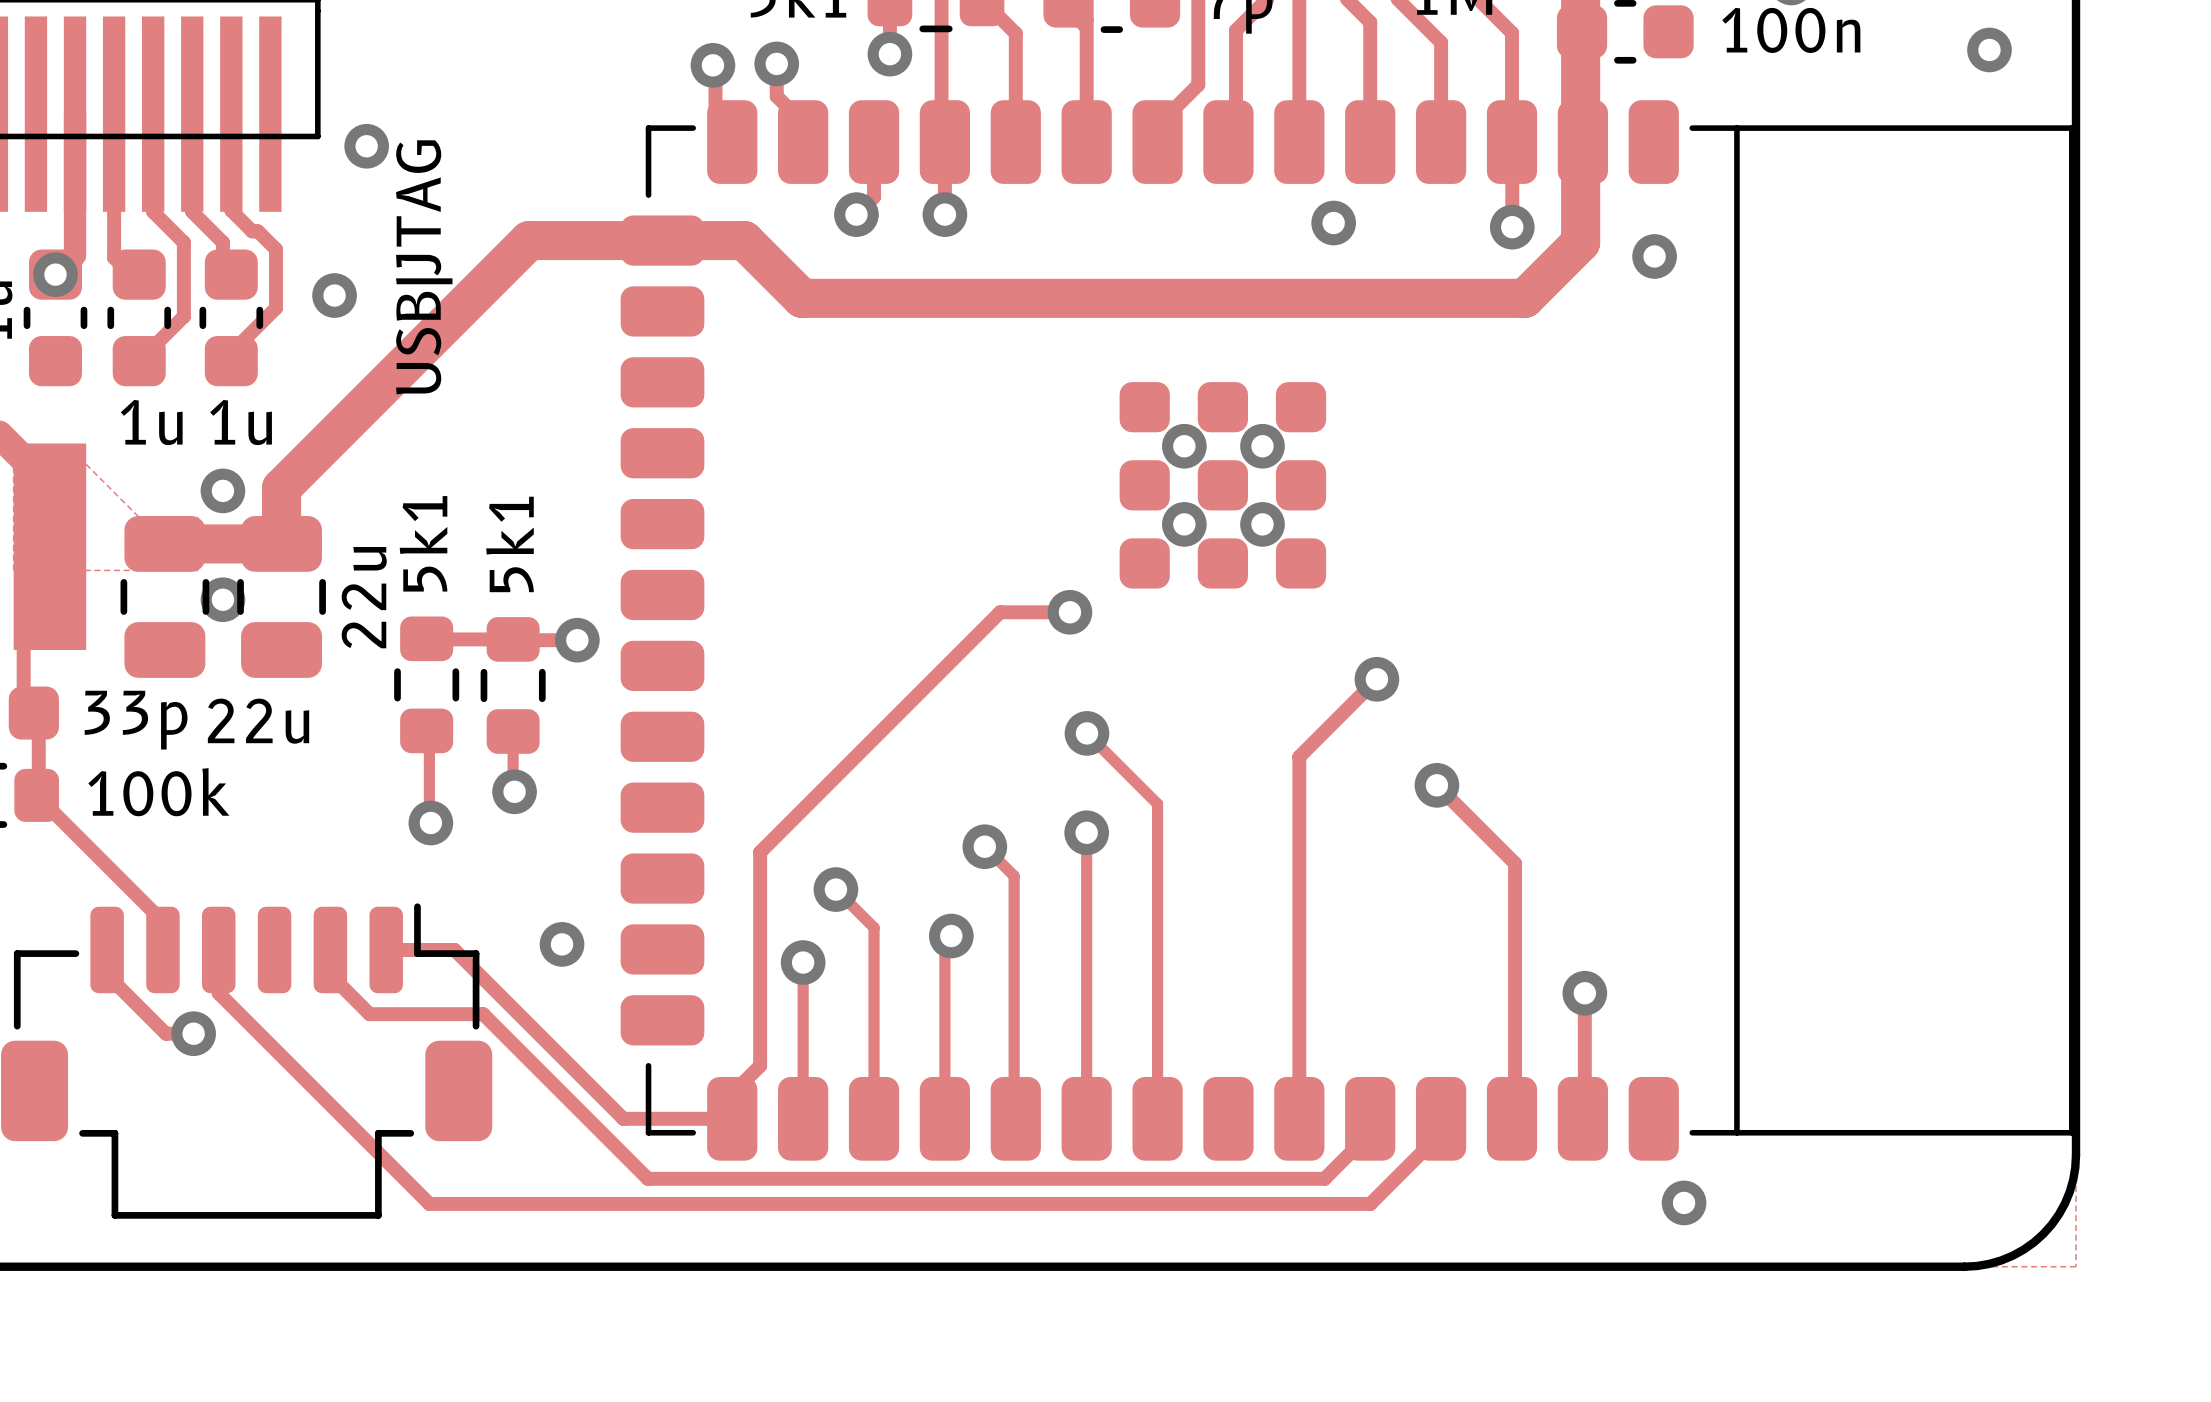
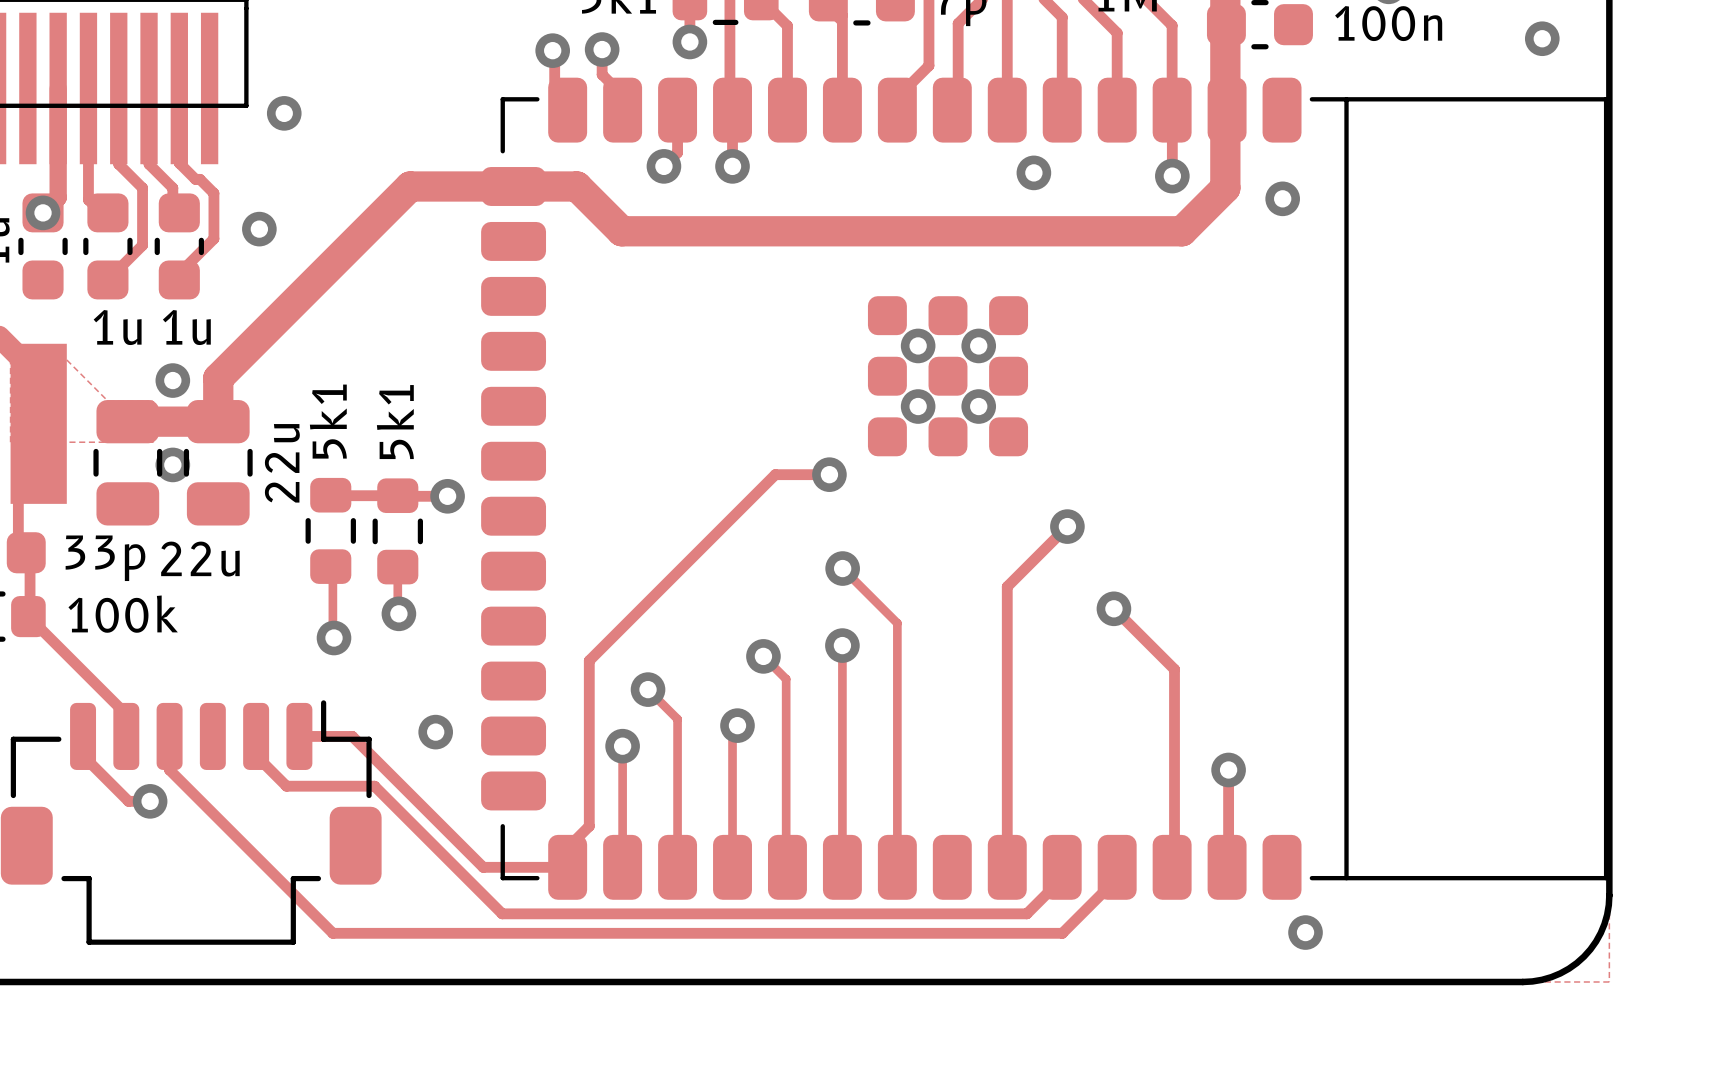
text: USB|JTAG (424, 267) -> none

